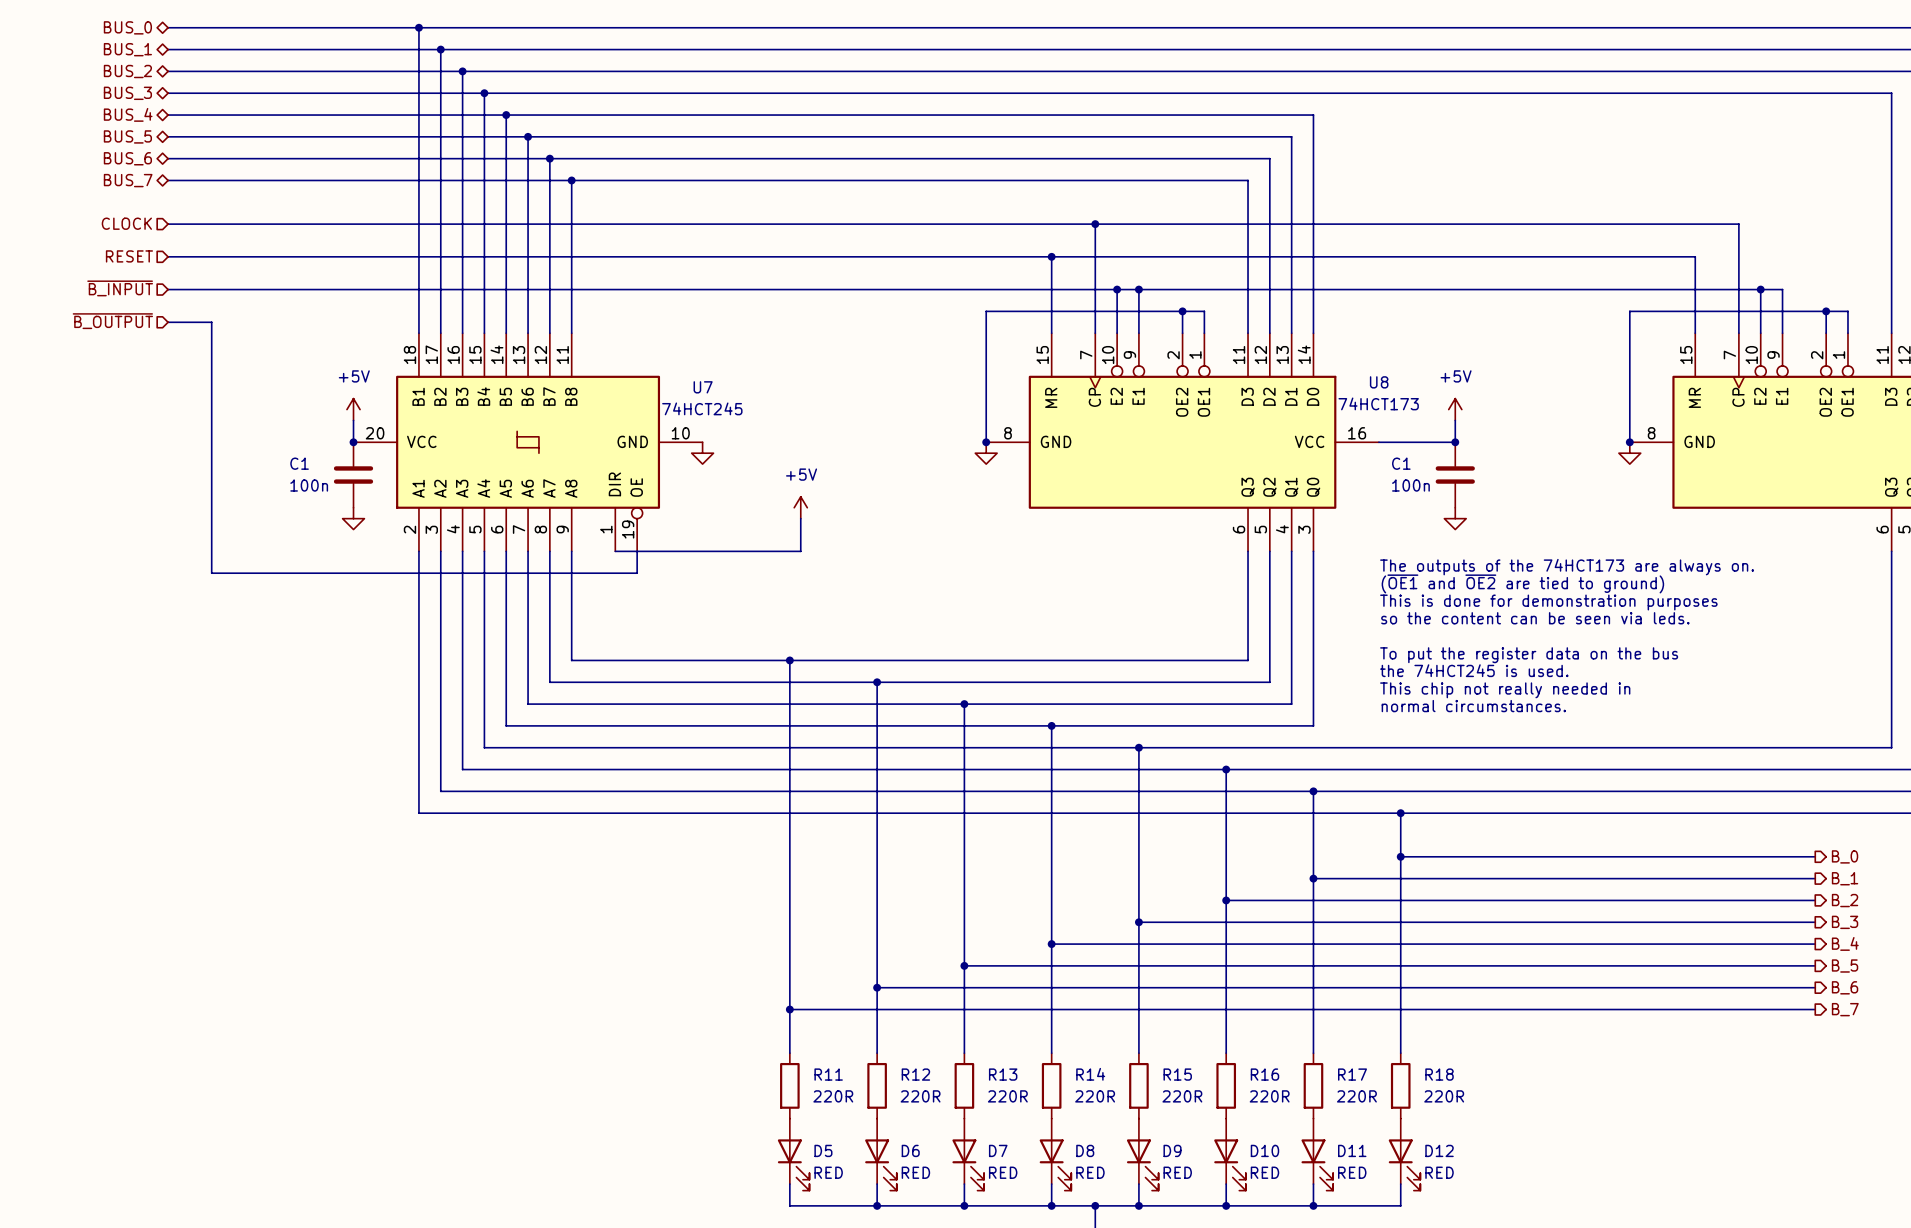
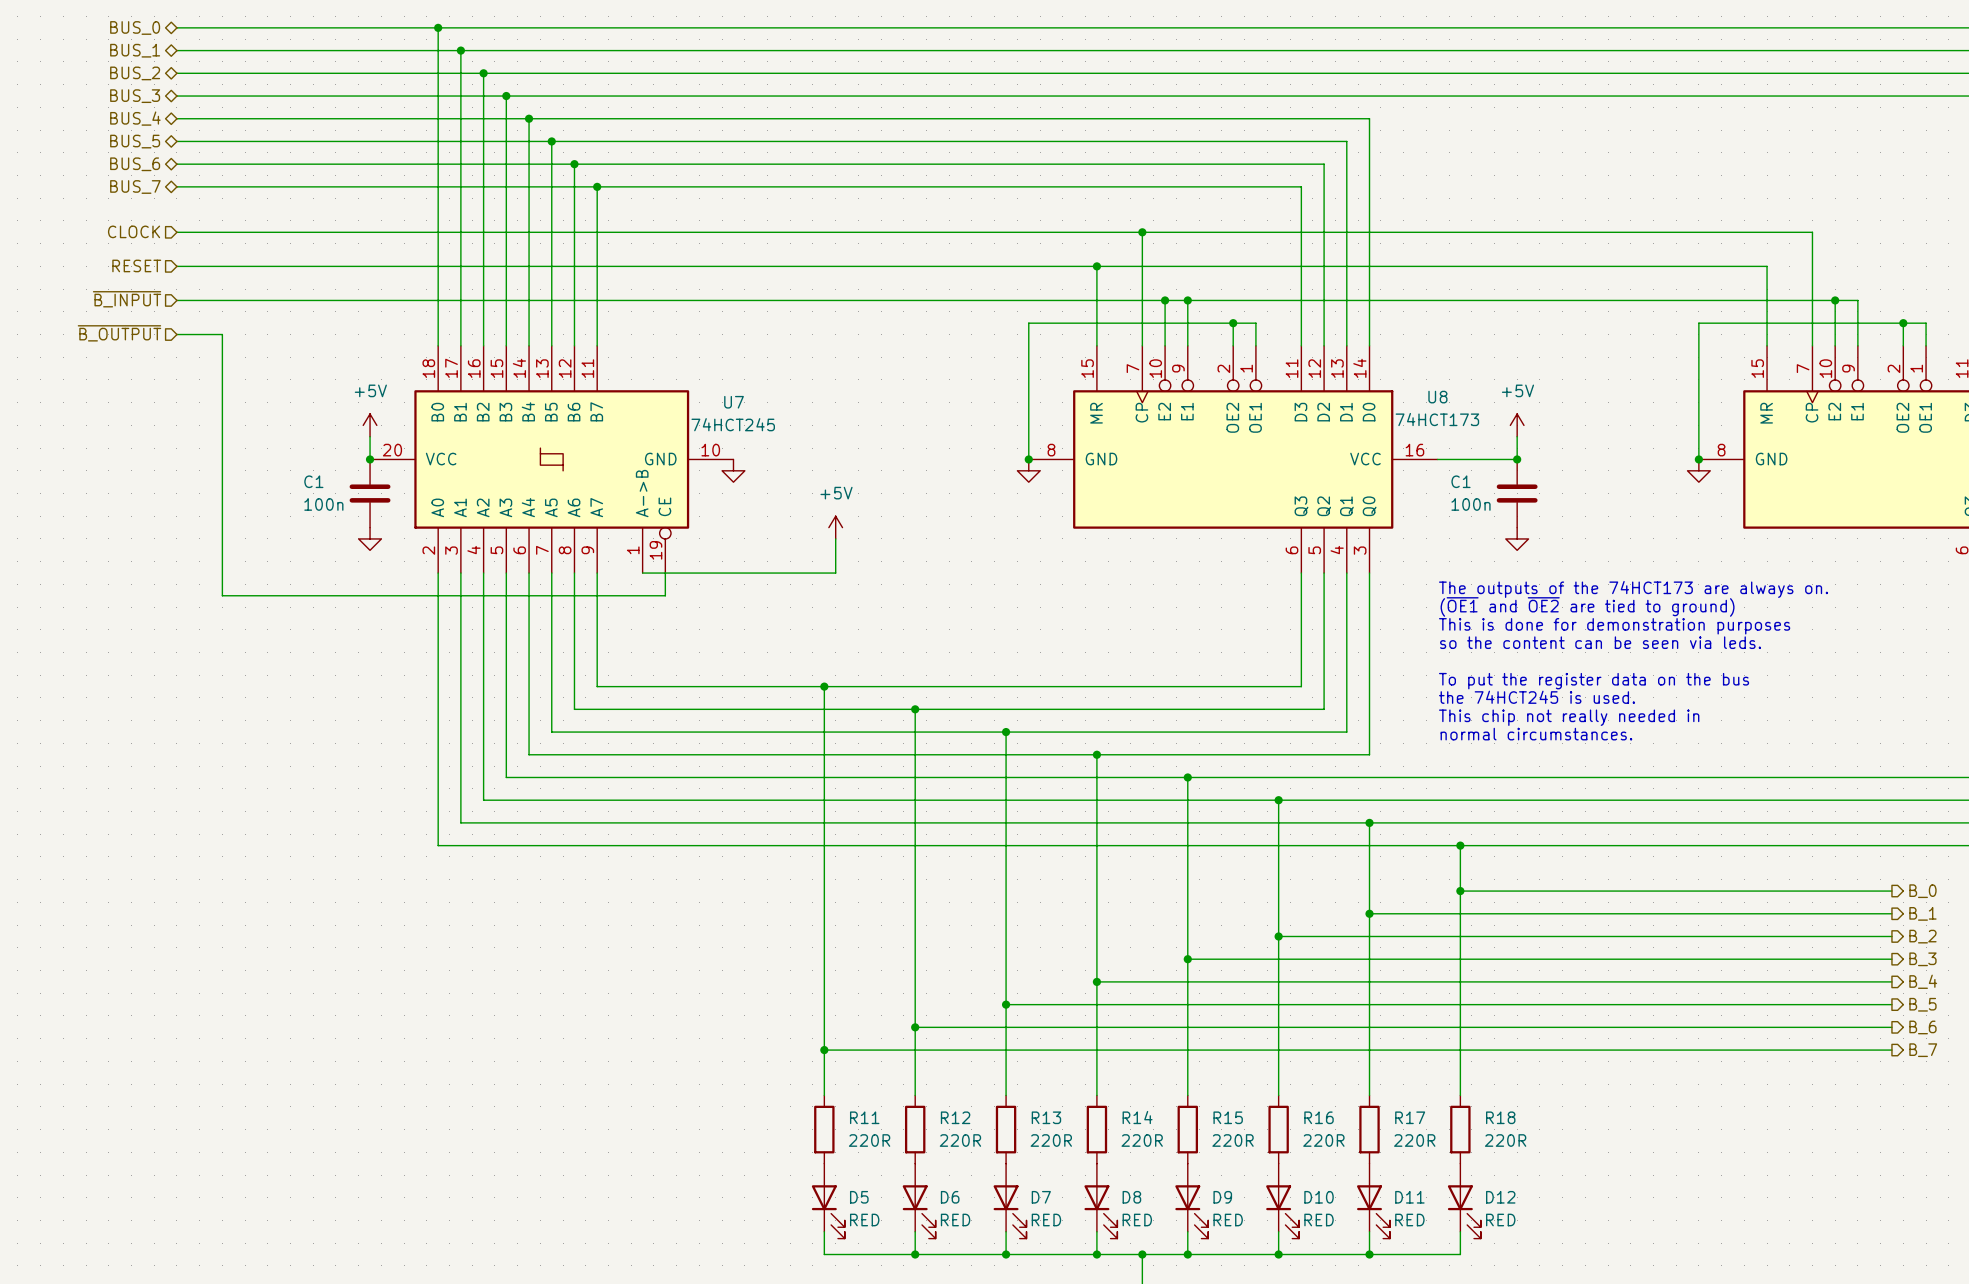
U7 symbol: [353, 333, 703, 552] -> [370, 345, 734, 574]

